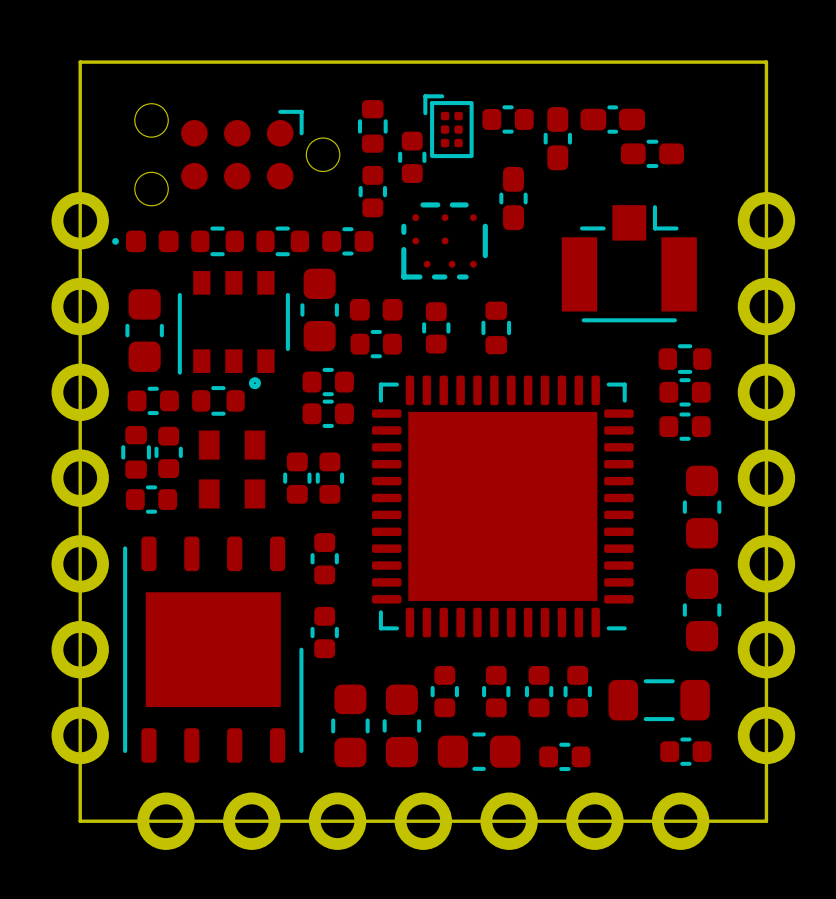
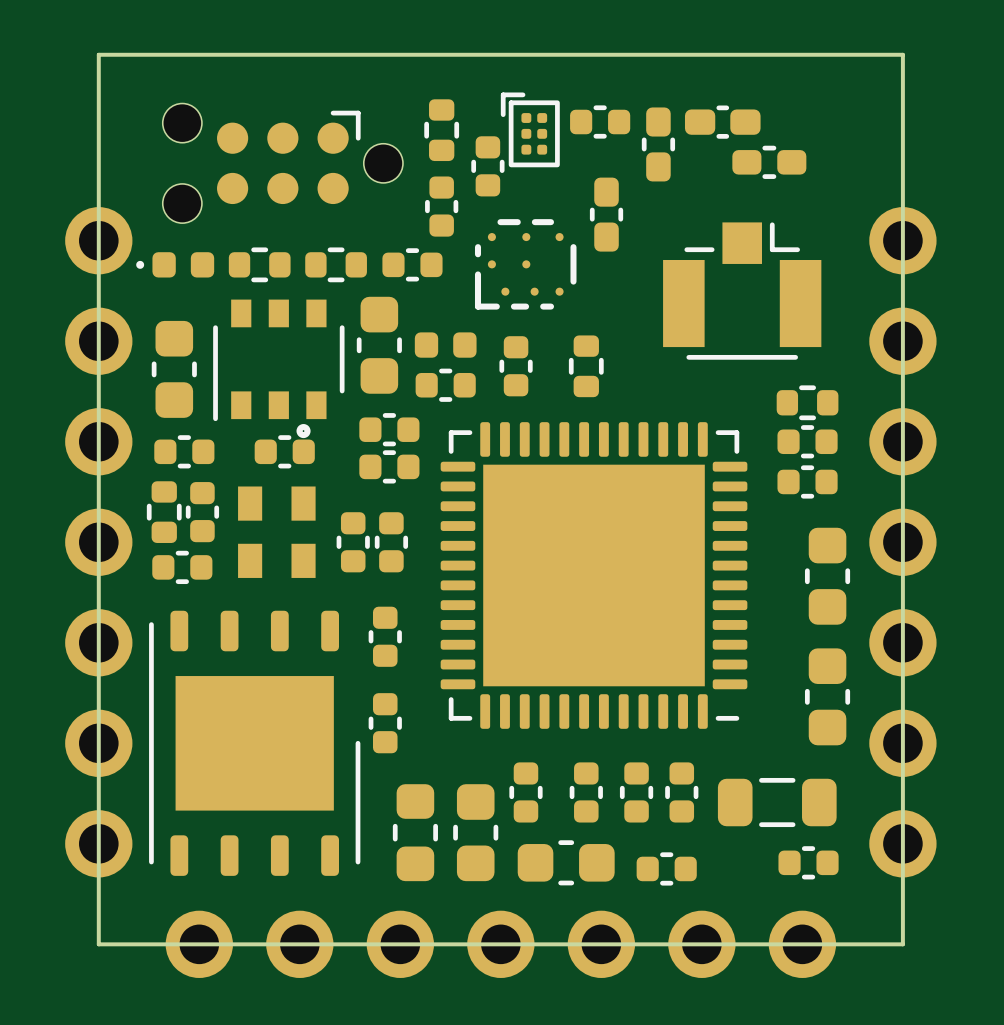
part footprint: [192, 386, 245, 416] -> [254, 435, 315, 469]

